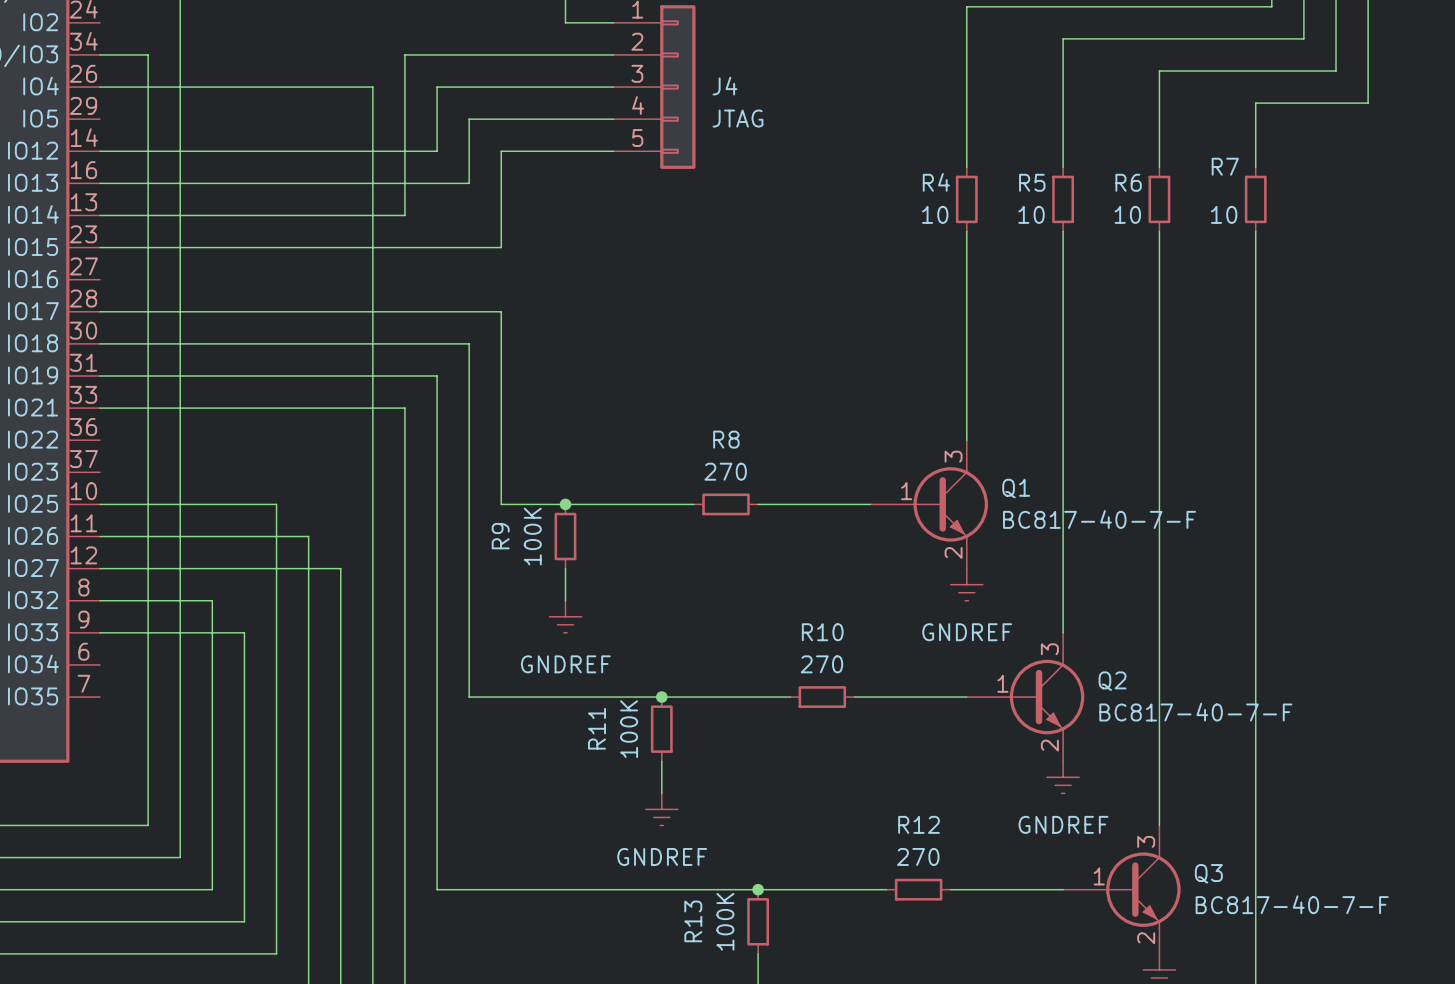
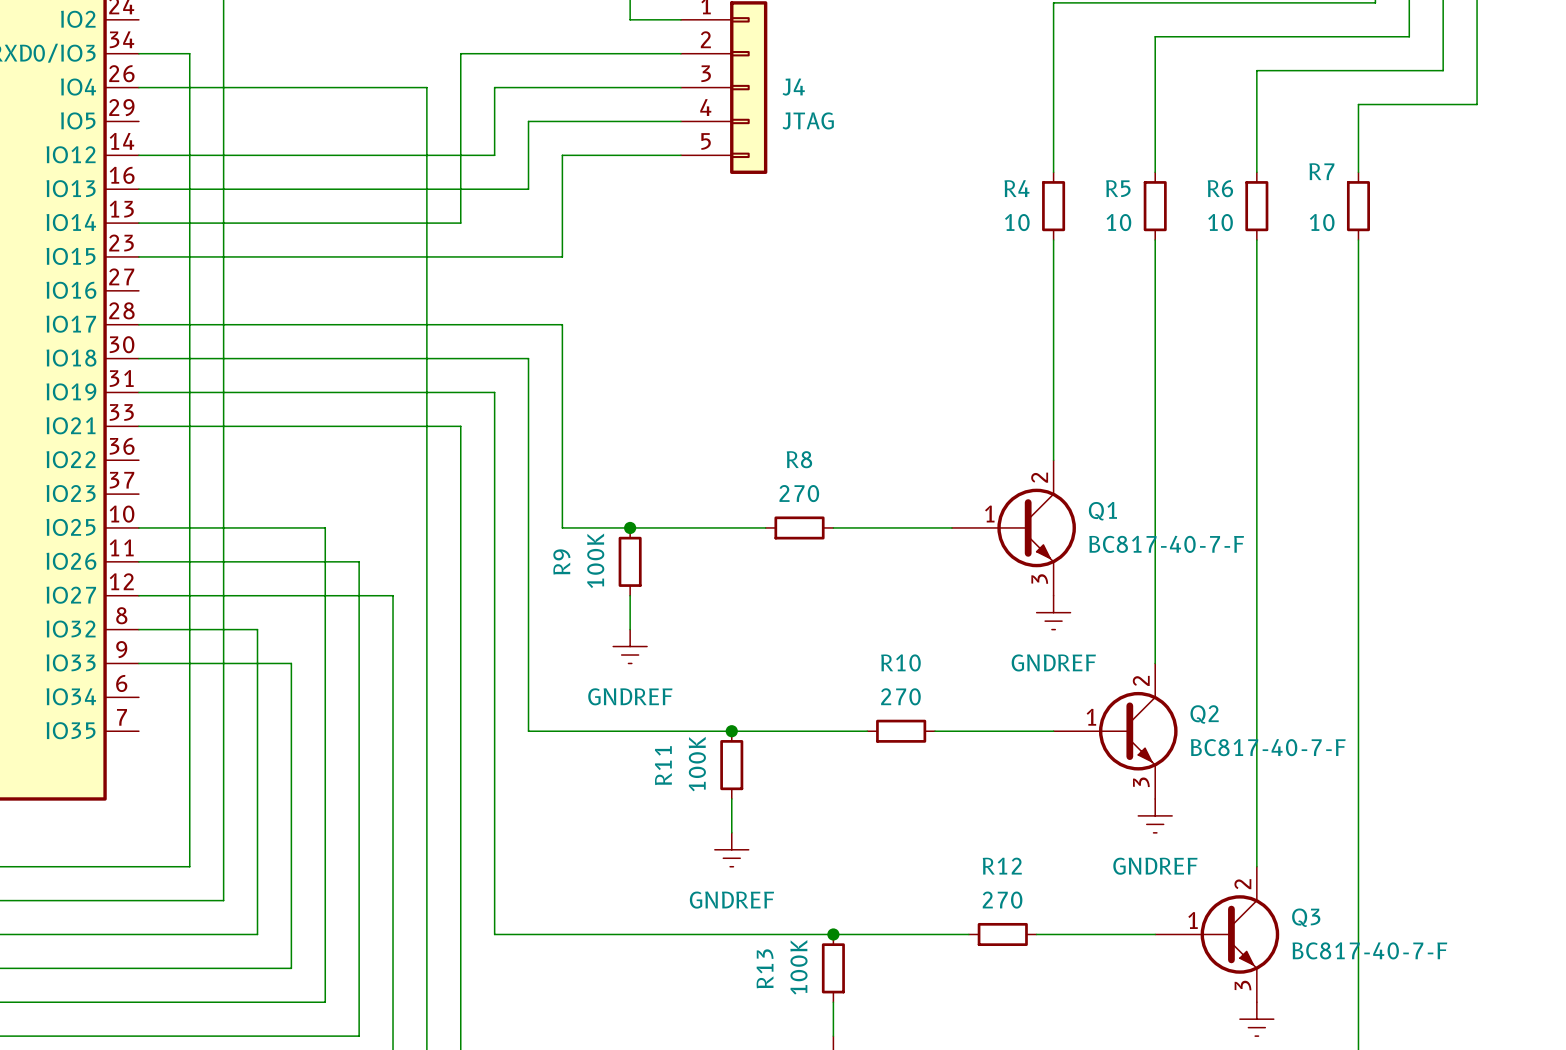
Q1 pin number: 3 (953, 456) -> 2 (1039, 477)
Q1 pin number: 2 (953, 552) -> 3 (1039, 579)
Q2 pin number: 3 (1049, 649) -> 2 (1141, 680)
Q2 pin number: 2 (1049, 745) -> 3 (1141, 782)
Q3 pin number: 3 (1146, 841) -> 2 (1242, 884)
Q3 pin number: 2 (1146, 938) -> 3 (1242, 985)

